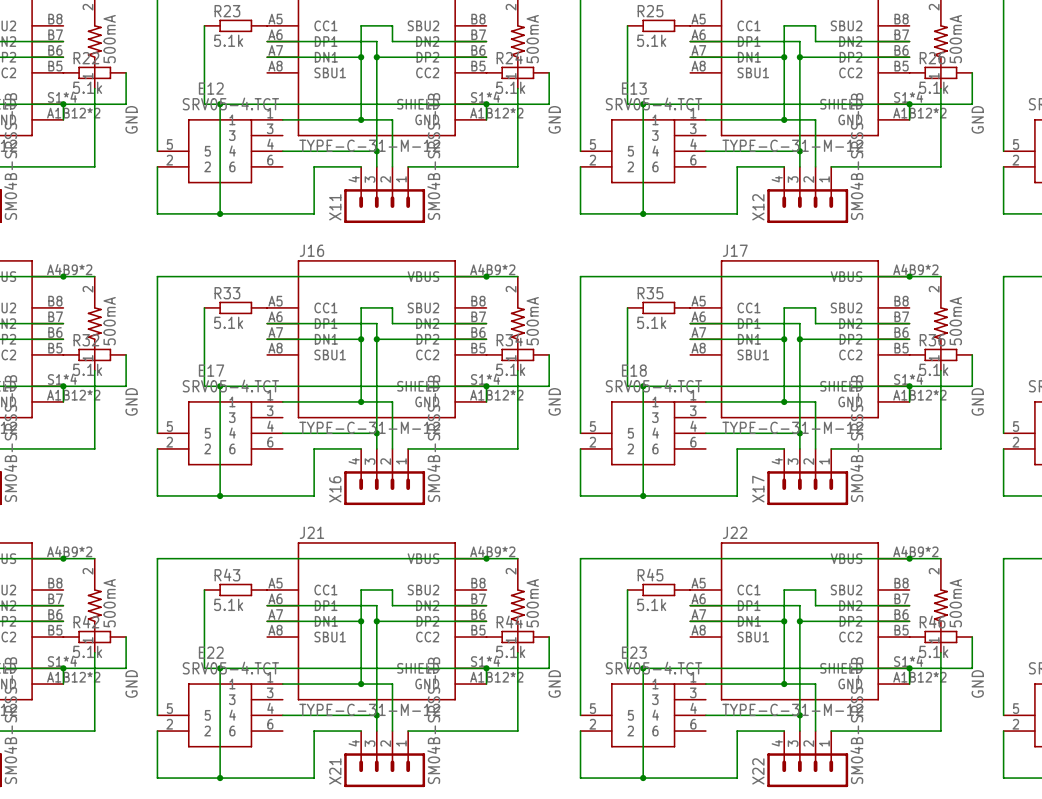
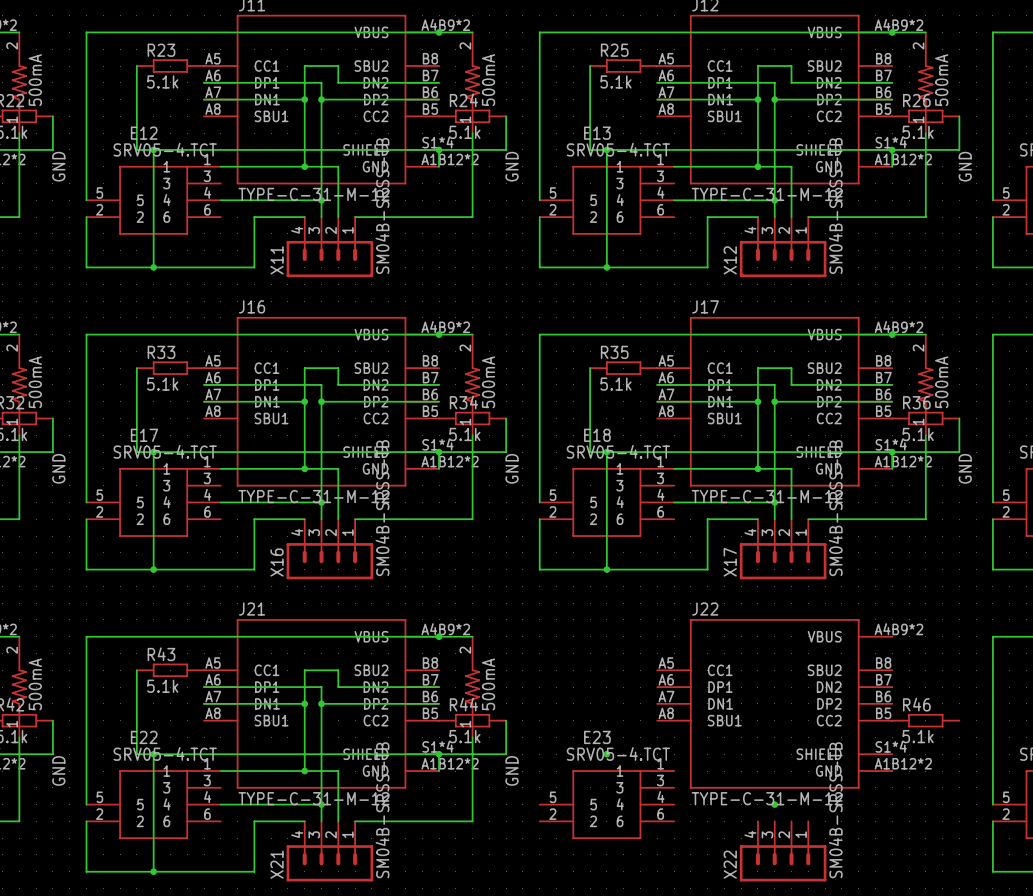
junction: (909, 558) -> none
wire: (940, 558) (580, 558) (580, 715) -> none
wire: (627, 589) (627, 668) (972, 668) (972, 637) -> none
R45: 5.1k (658, 589) -> none
wire: (690, 605) (799, 605) (799, 731) -> none
wire: (909, 605) (815, 605) (815, 589) (784, 589) (784, 684) -> none
part: 500mA (940, 605) -> none
wire: (690, 621) (784, 621) -> none
junction: (784, 621) -> none
wire: (799, 621) (909, 621) -> none
junction: (799, 621) -> none
wire: (940, 652) (940, 731) (831, 731) -> none
wire: (643, 668) (643, 778) -> none
wire: (909, 668) (909, 684) -> none
junction: (909, 668) -> none
label: GND (977, 683) -> none
wire: (705, 684) (815, 684) (815, 731) -> none
junction: (784, 684) -> none
wire: (705, 715) (799, 715) -> none
wire: (580, 731) (580, 778) (737, 778) (737, 731) (784, 731) -> none
junction: (643, 778) -> none

